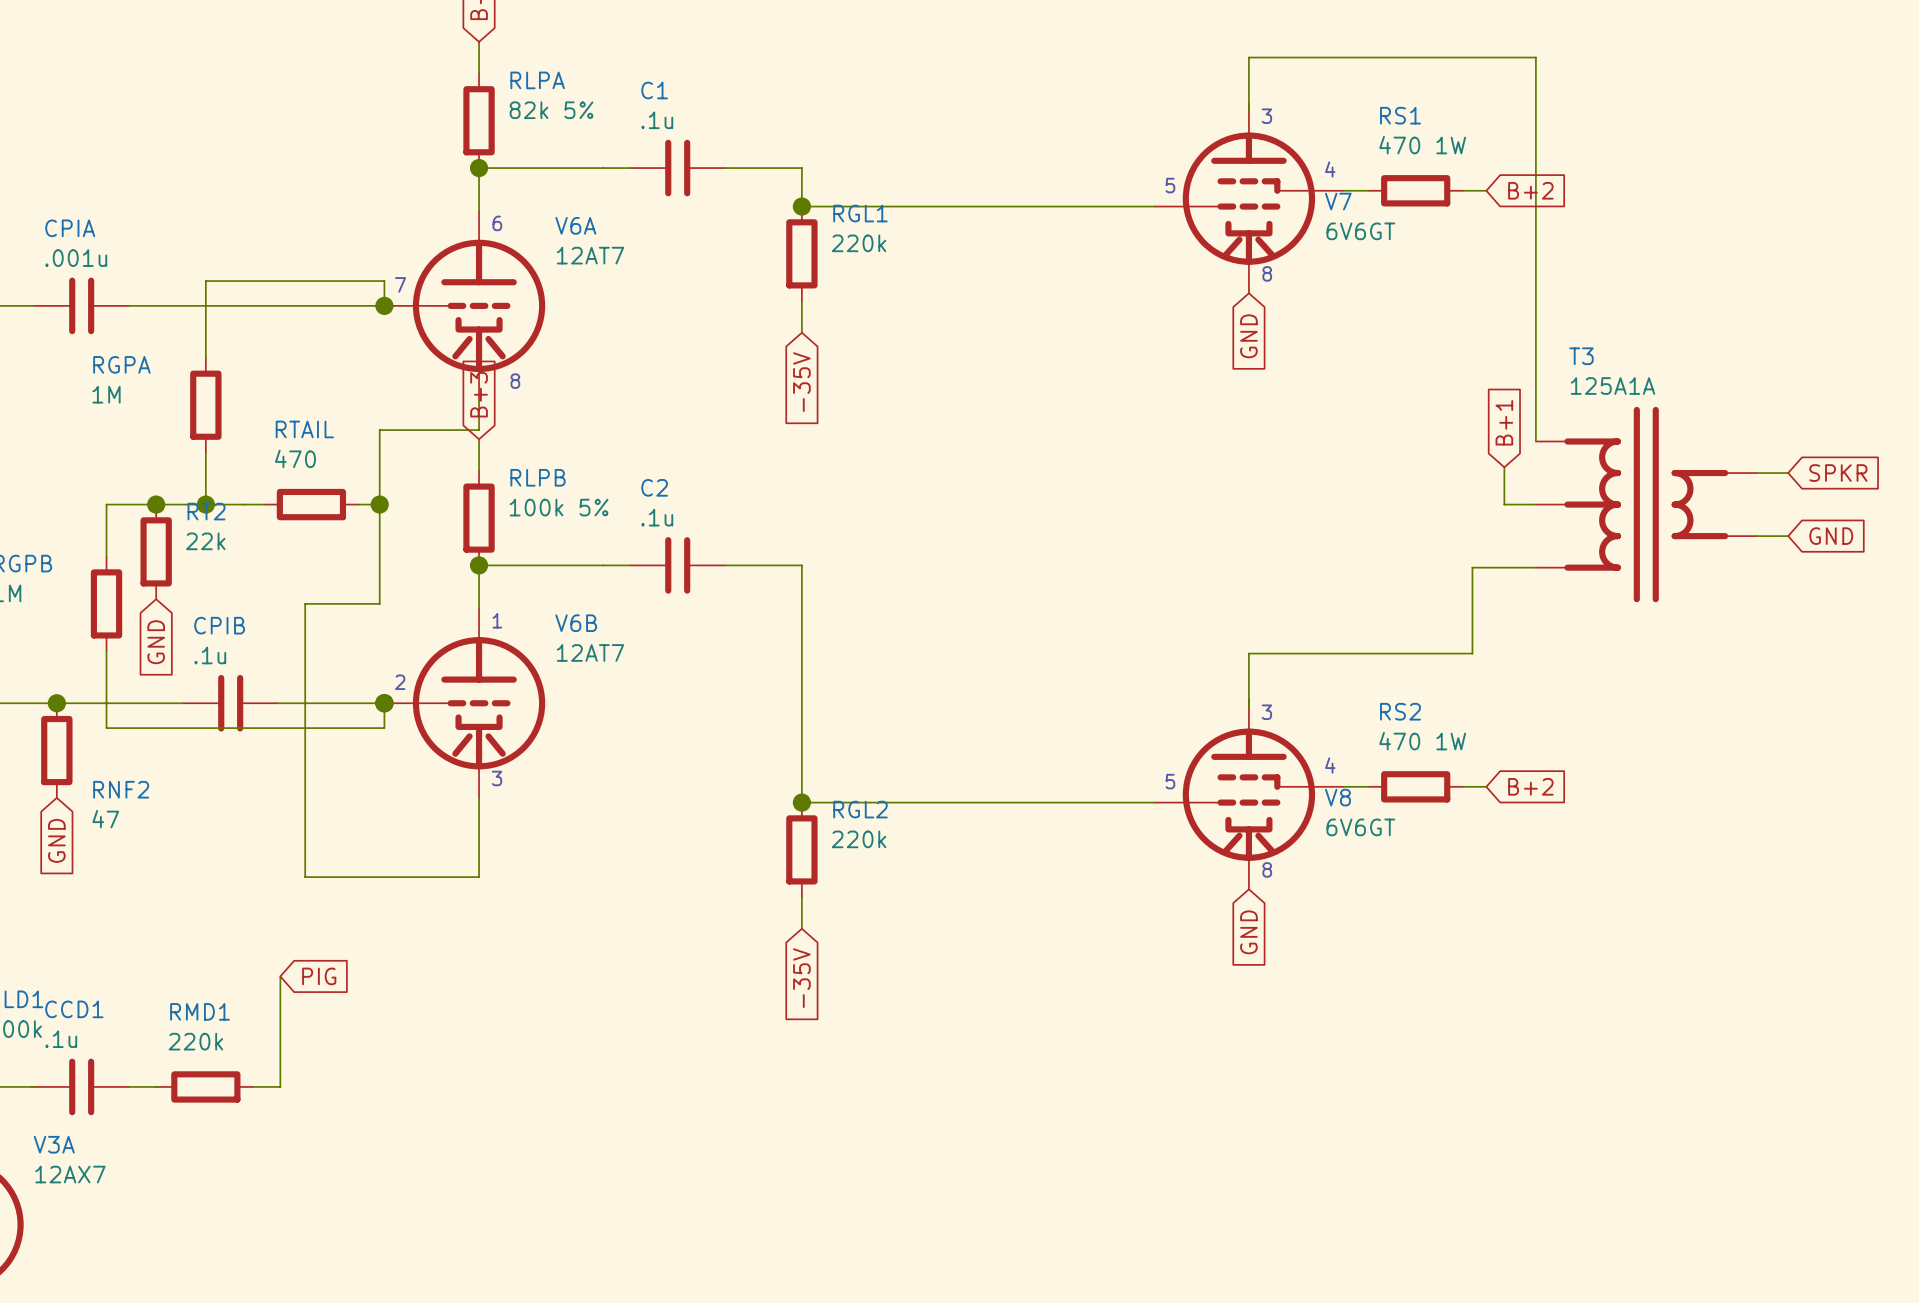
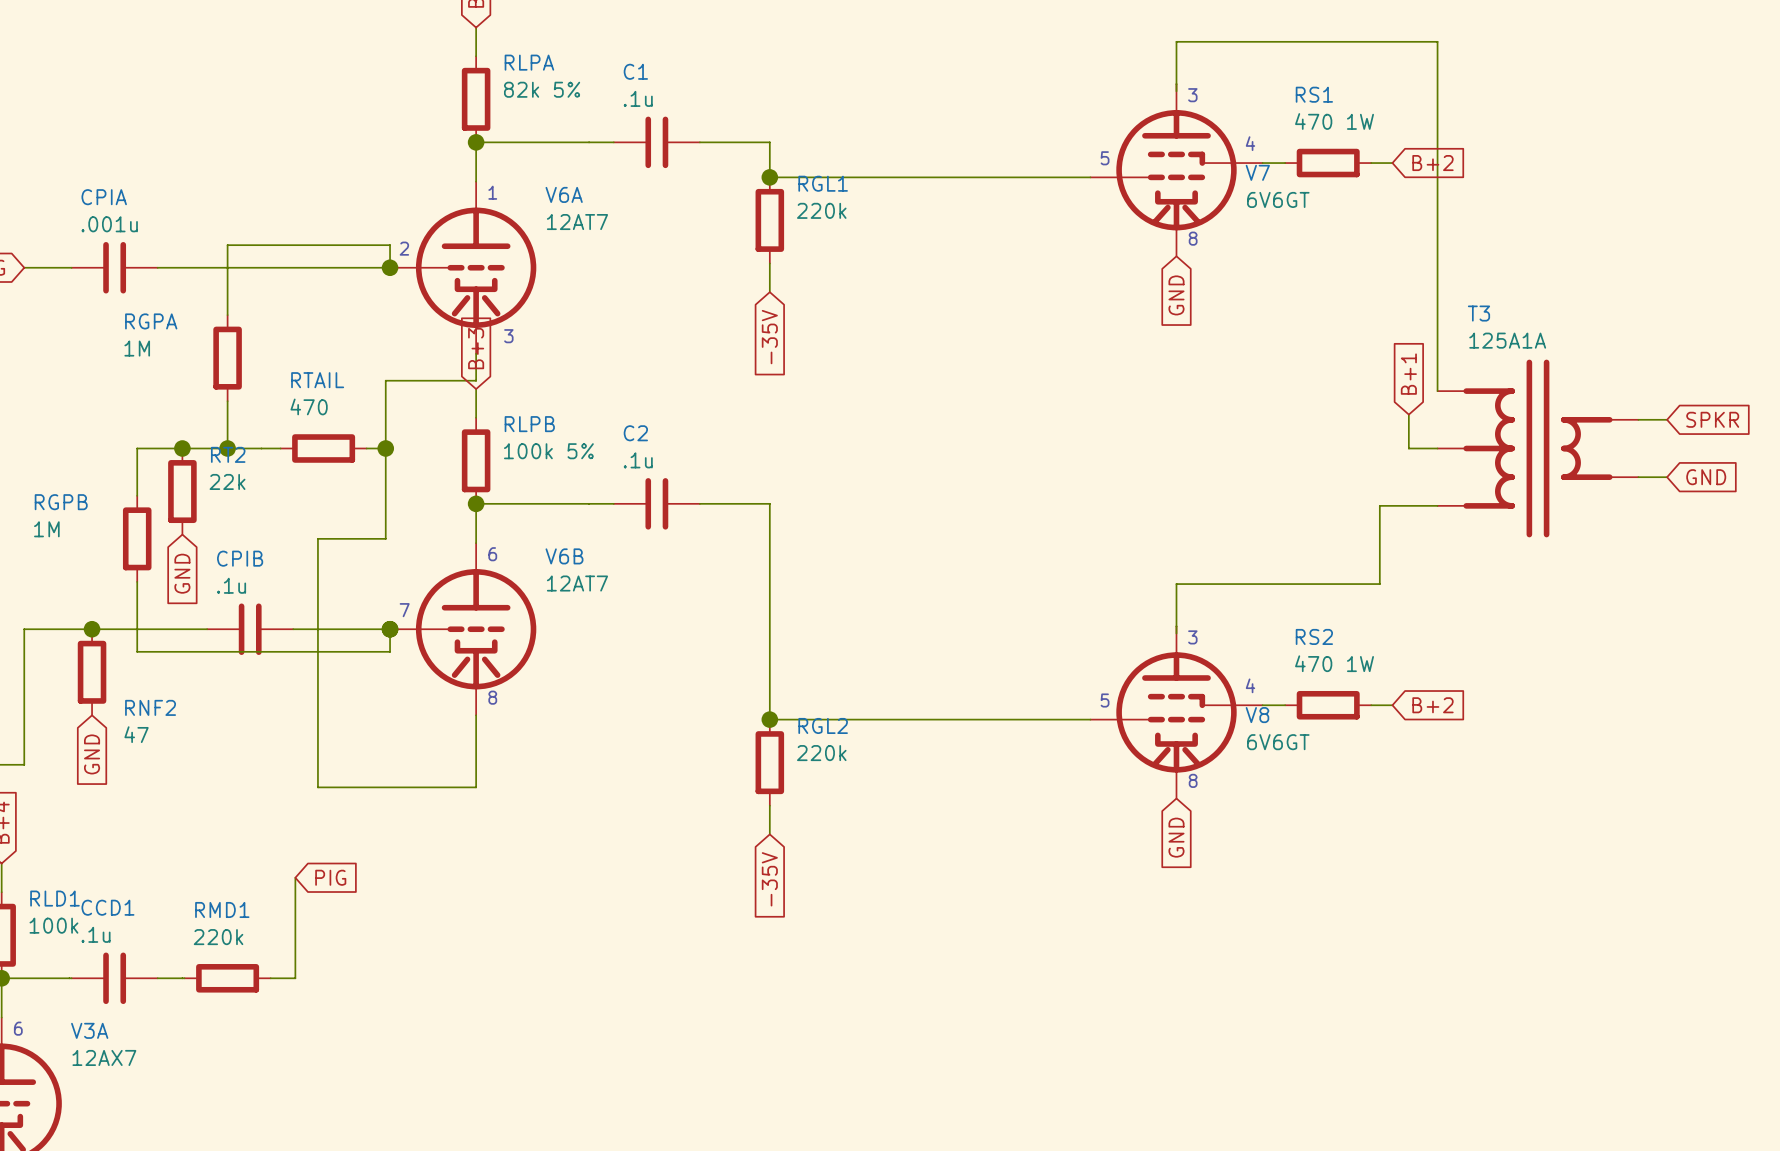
text: 6 (497, 223) -> 1 (492, 192)
text: 7 (400, 284) -> 2 (404, 248)
text: 8 (515, 381) -> 3 (508, 336)
text: 1 (497, 620) -> 6 (492, 554)
text: 2 (400, 682) -> 7 (404, 610)
text: 3 (497, 778) -> 8 (492, 697)

